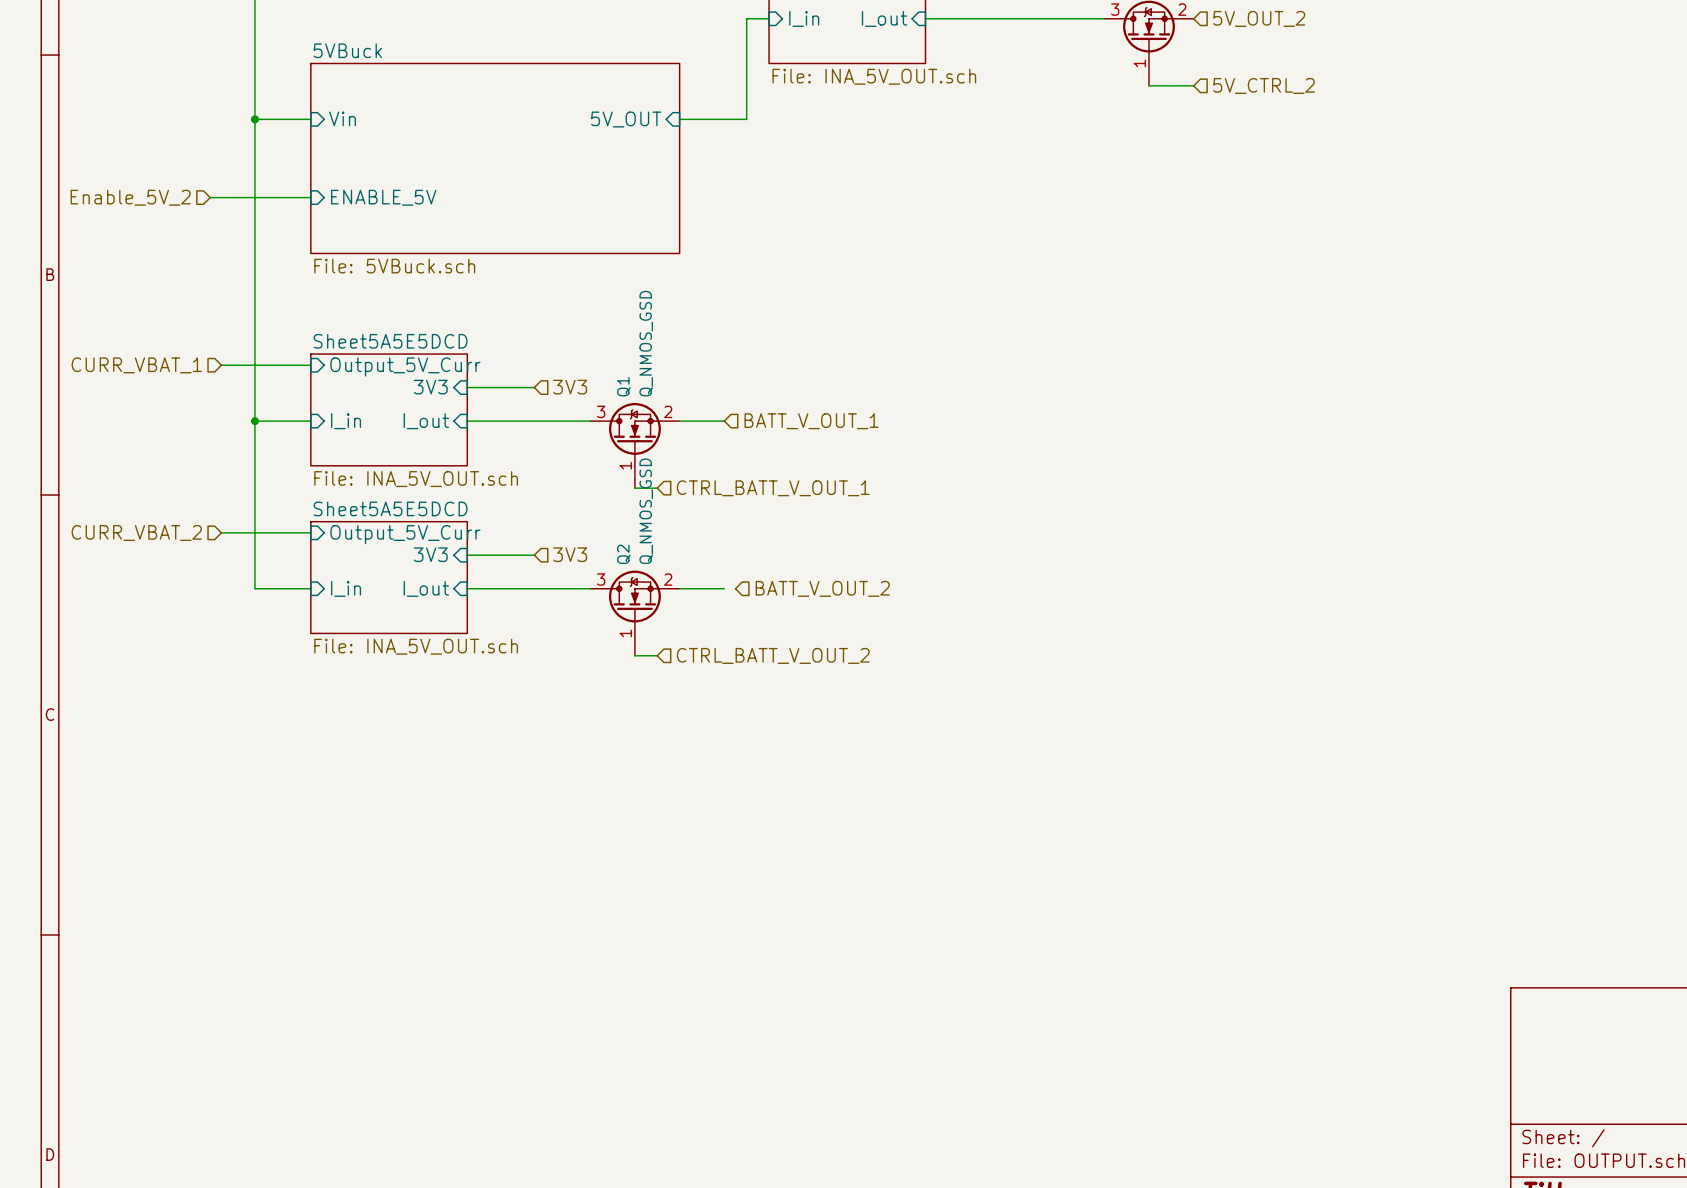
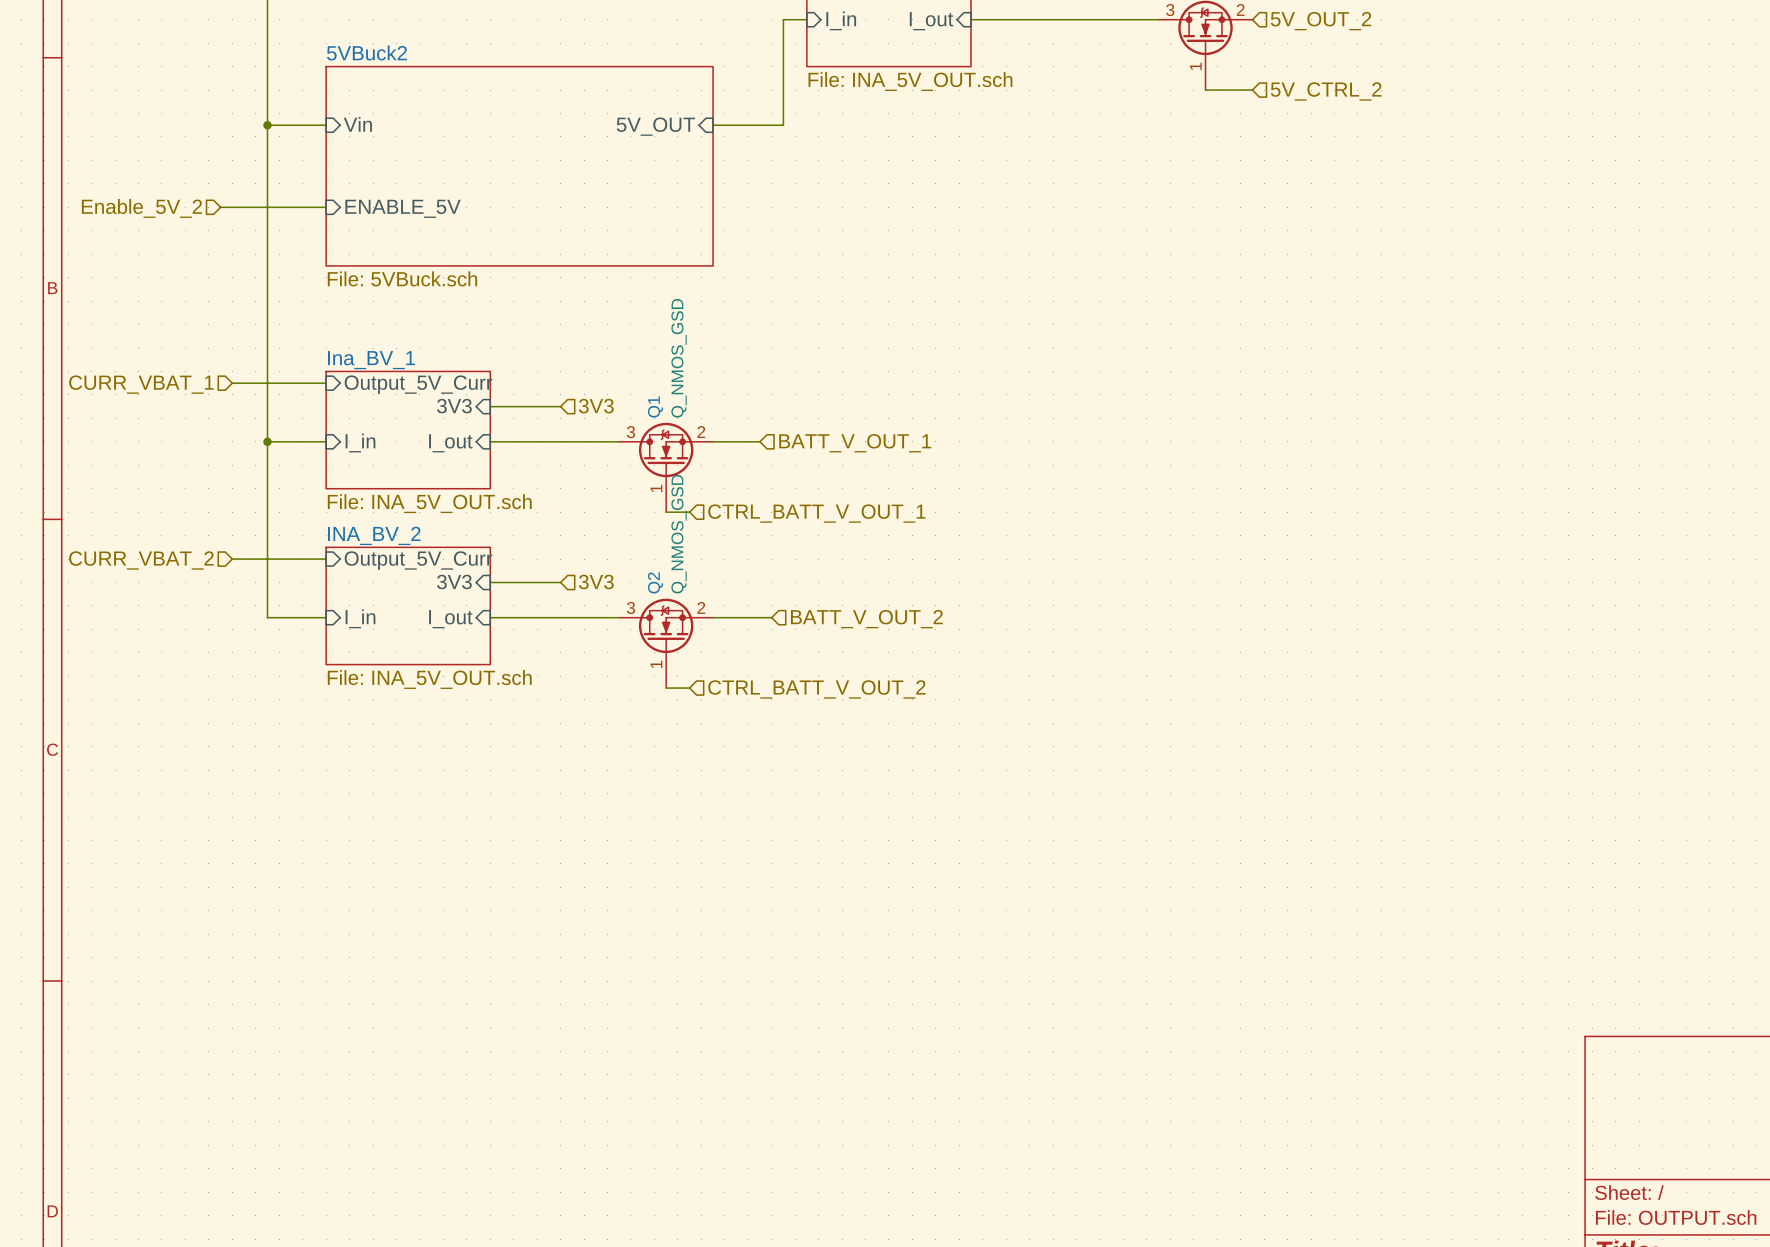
sheet 5VBuck name: 5VBuck (347, 50) -> 5VBuck2 (366, 52)
sheet Sheet5A5E5DCD name: Sheet5A5E5DCD (390, 341) -> Ina_BV_1 (371, 360)
sheet Sheet5A5E5DCD name: Sheet5A5E5DCD (390, 508) -> INA_BV_2 (374, 535)
wire: none -> (759, 617) (771, 617)

